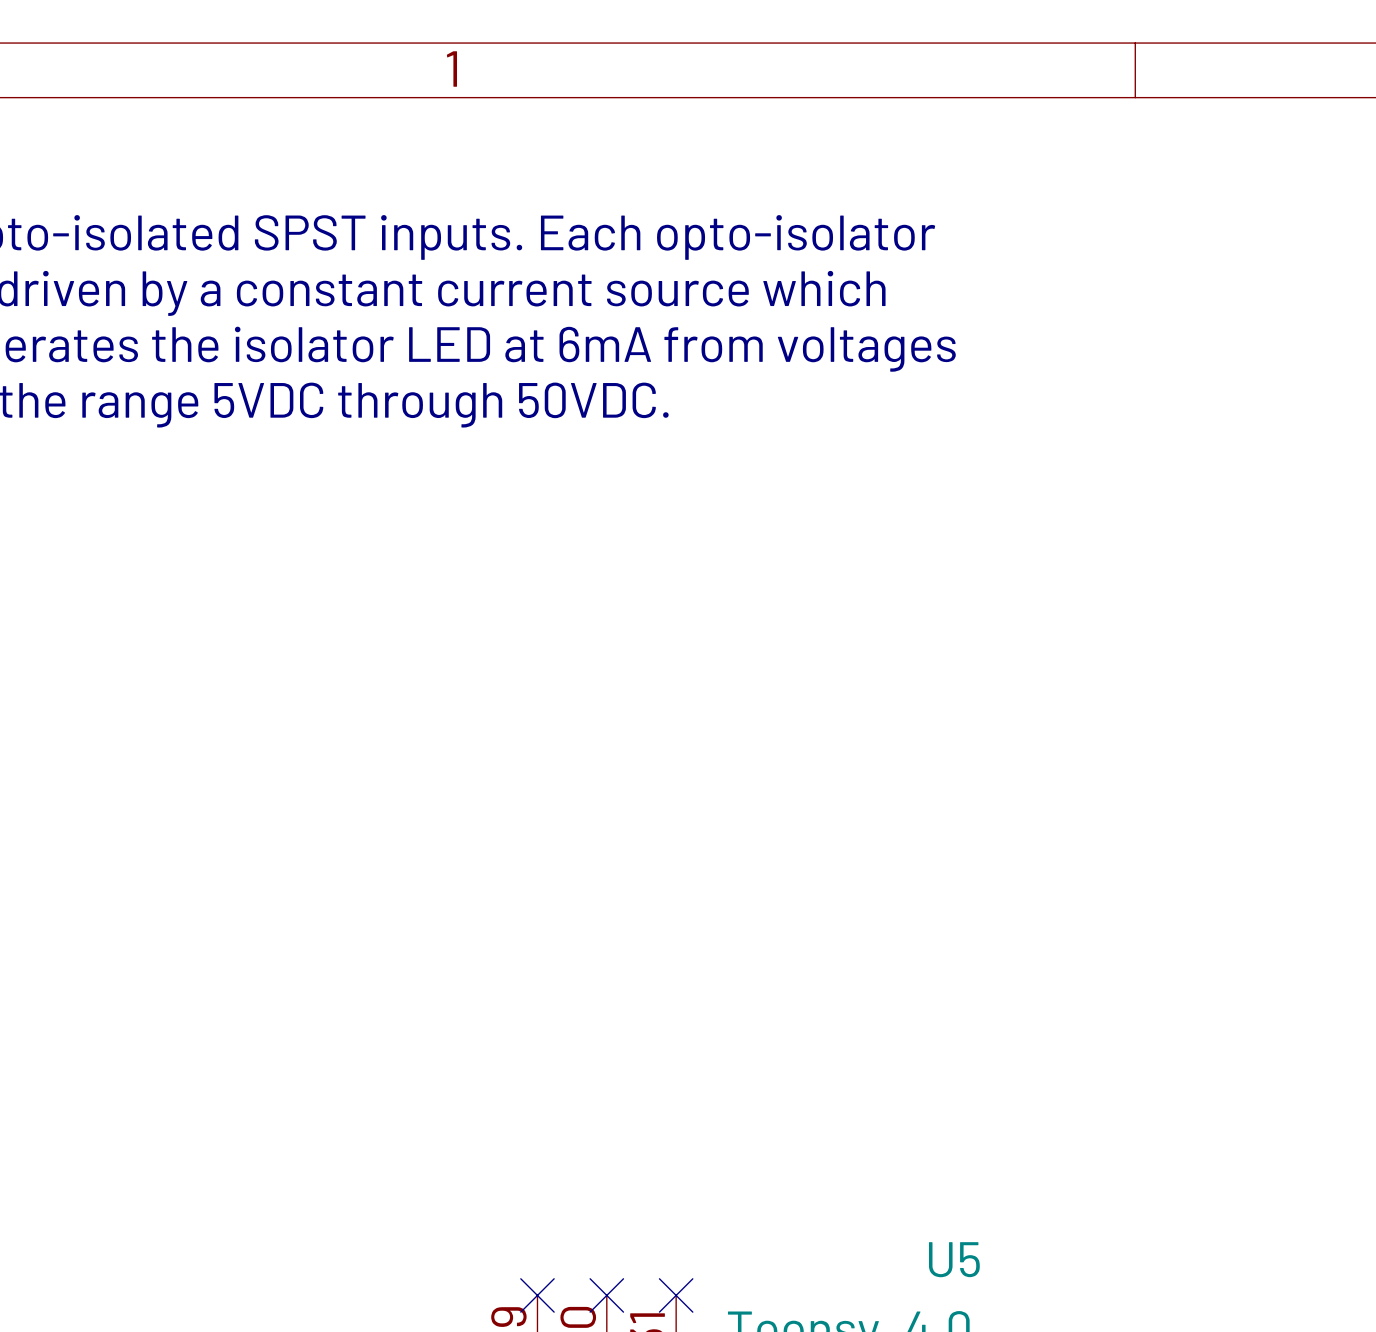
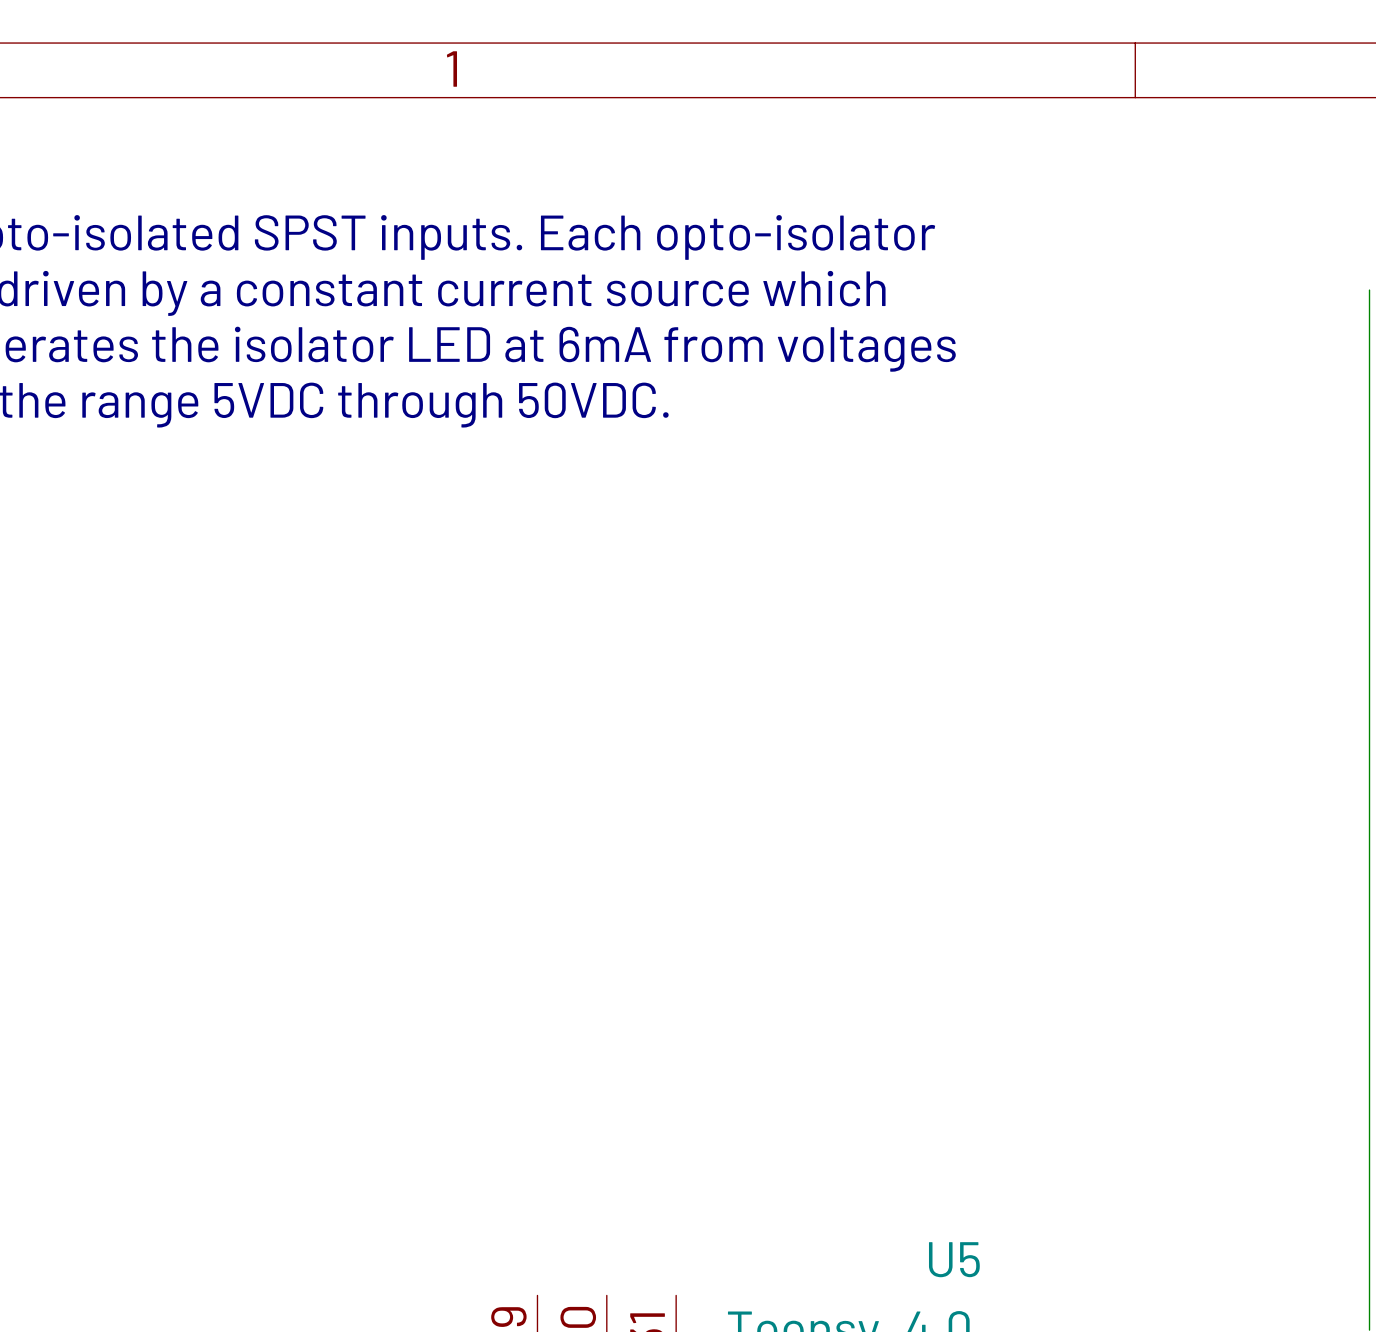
wire: none -> (1369, 290) (1369, 1330)
no-connect mark: (537, 1295) -> none
no-connect mark: (606, 1295) -> none
no-connect mark: (676, 1295) -> none

